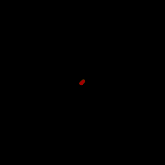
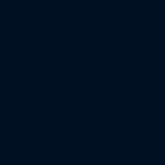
top track: (83, 81) (81, 83) -> none

